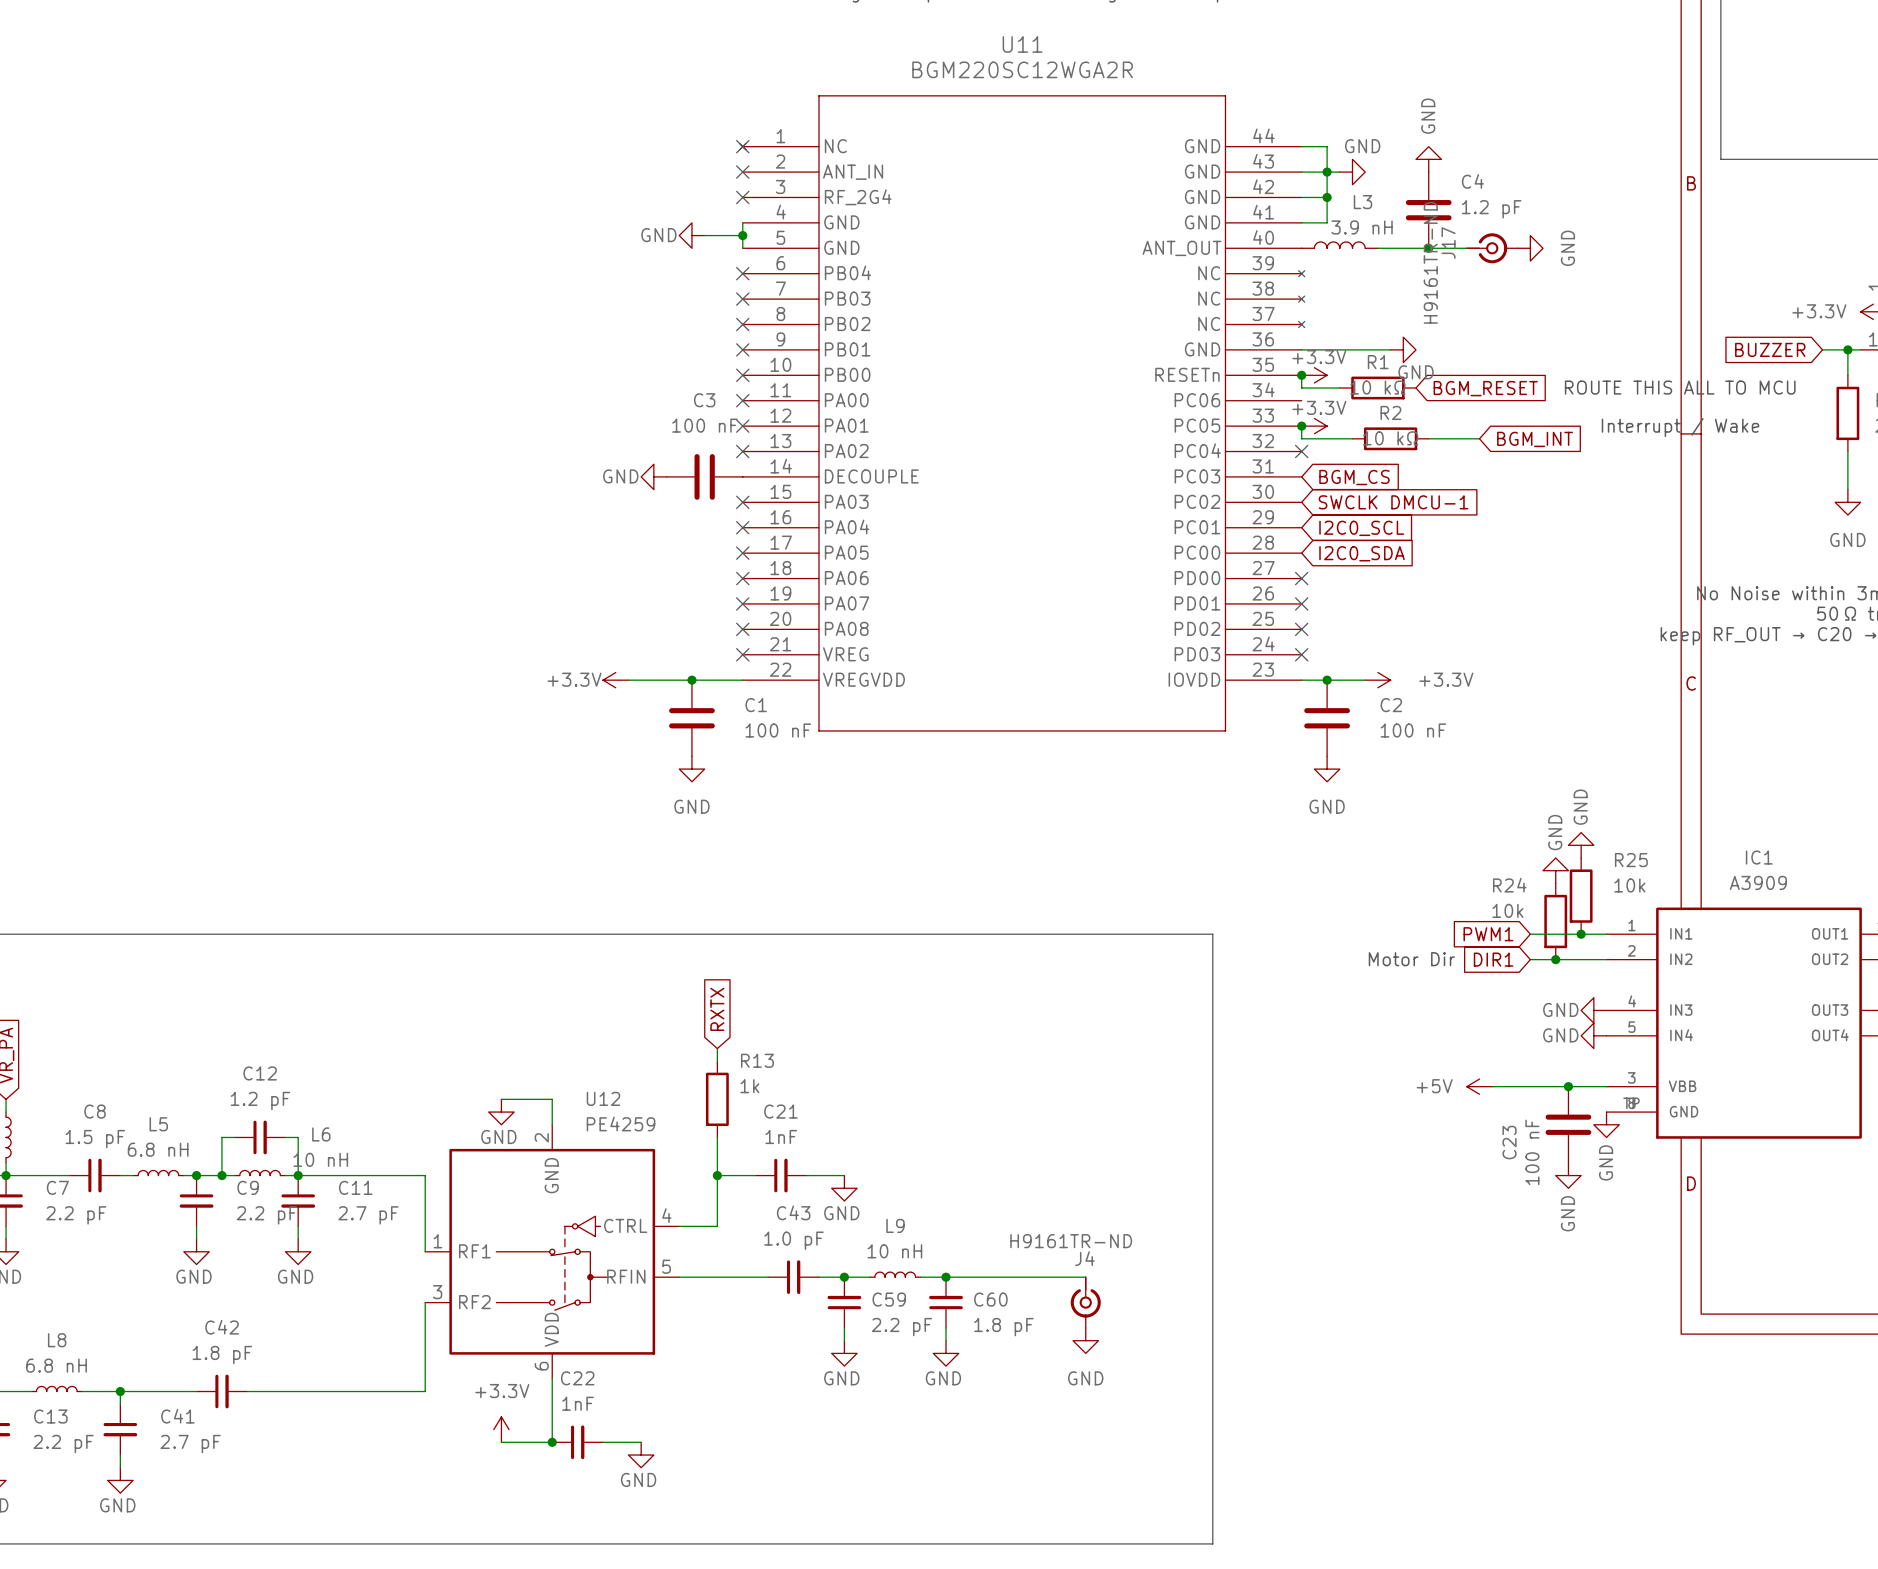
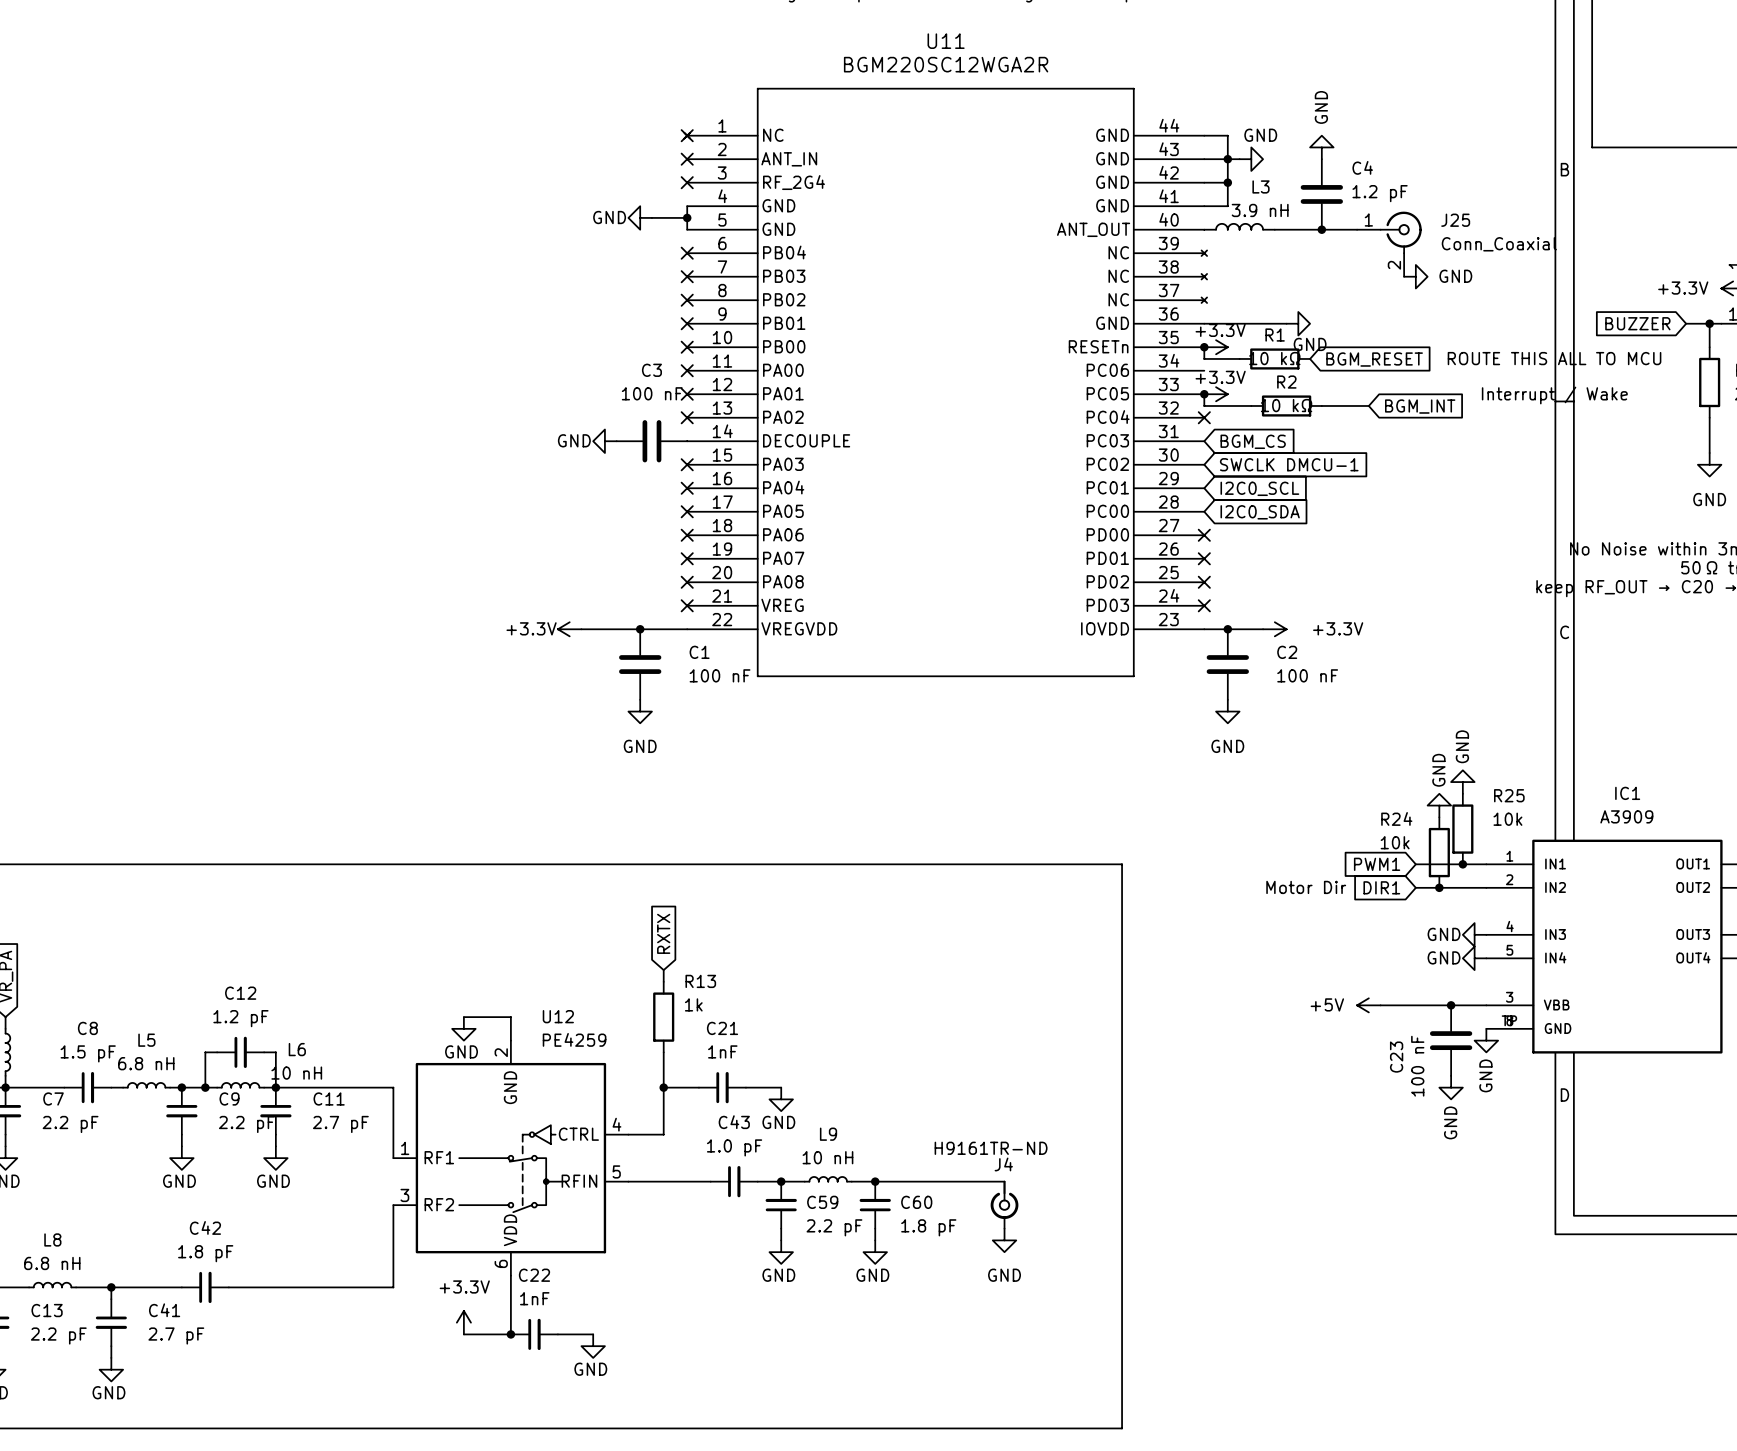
J17: H9161TR-ND (1492, 248) -> none
power symbol position: GND (1530, 248) -> GND (1415, 276)
power symbol text rotation: 0° (1567, 248) -> 90° clockwise (1455, 276)
J25: none -> Conn_Coaxial (1389, 244)

